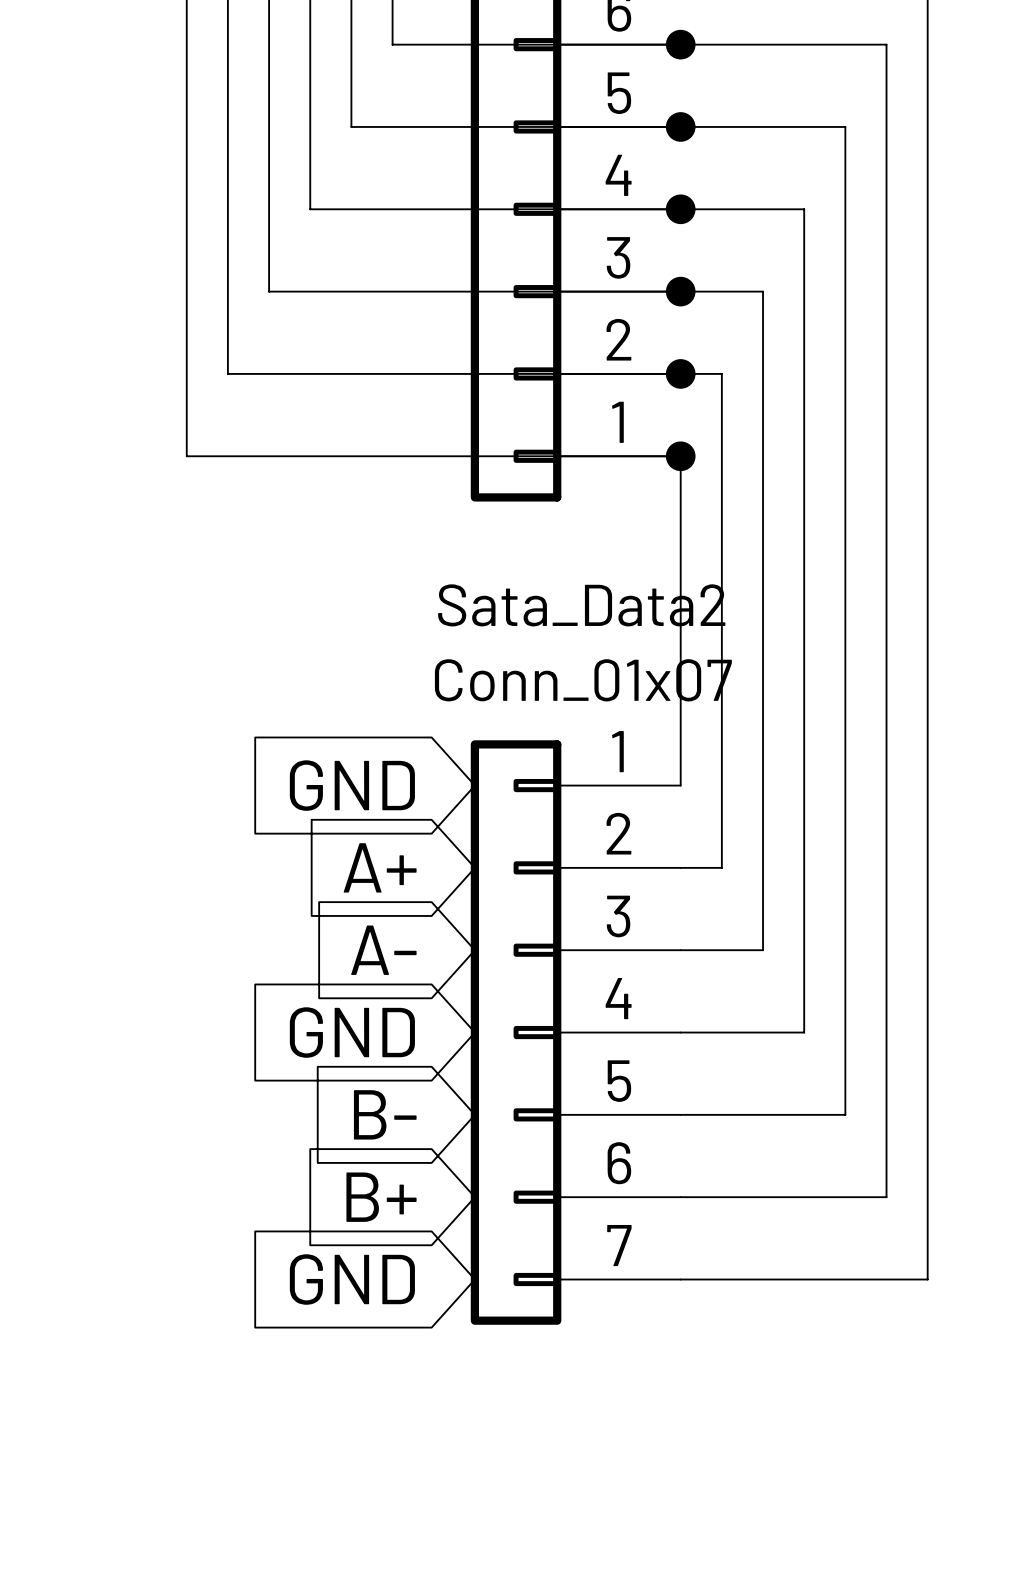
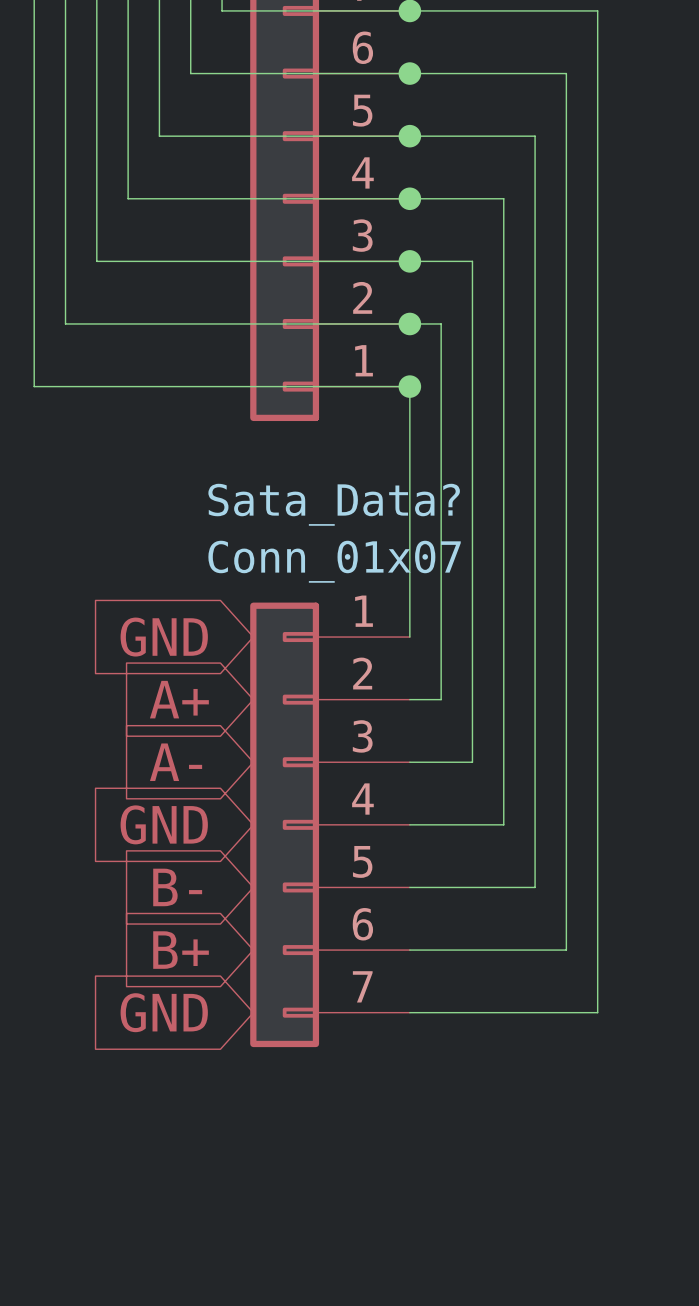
Sata_Data2 name: Sata_Data2 (581, 605) -> Sata_Data? (334, 504)

